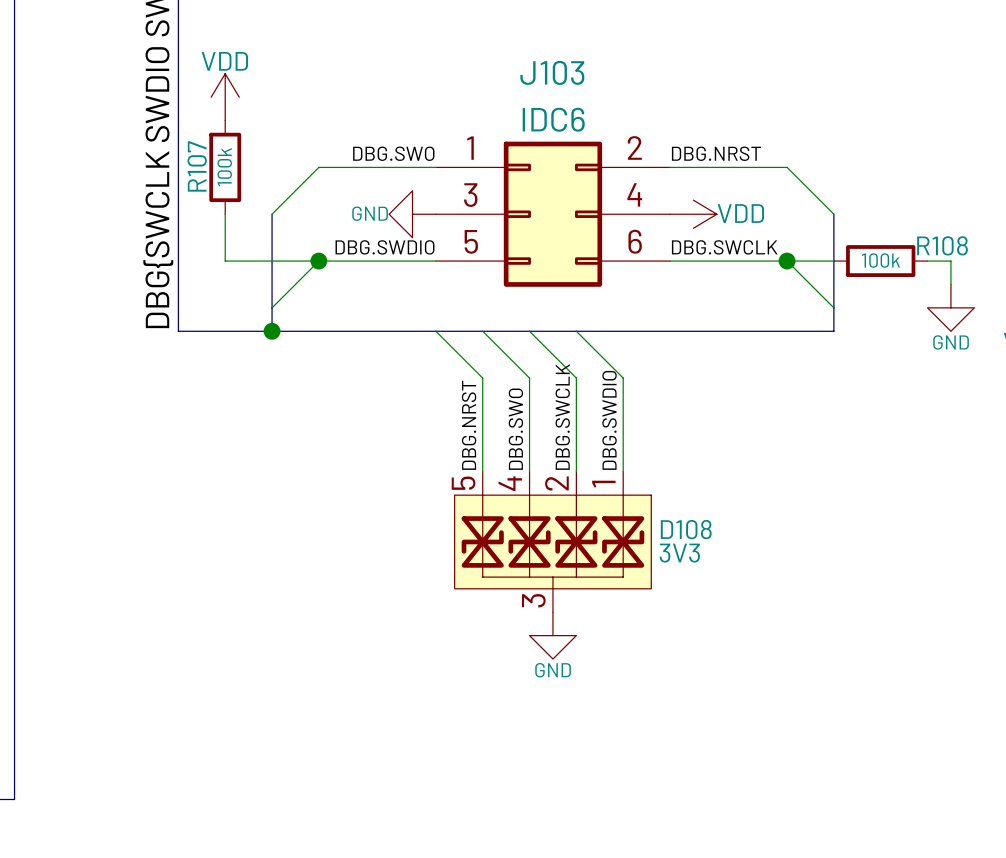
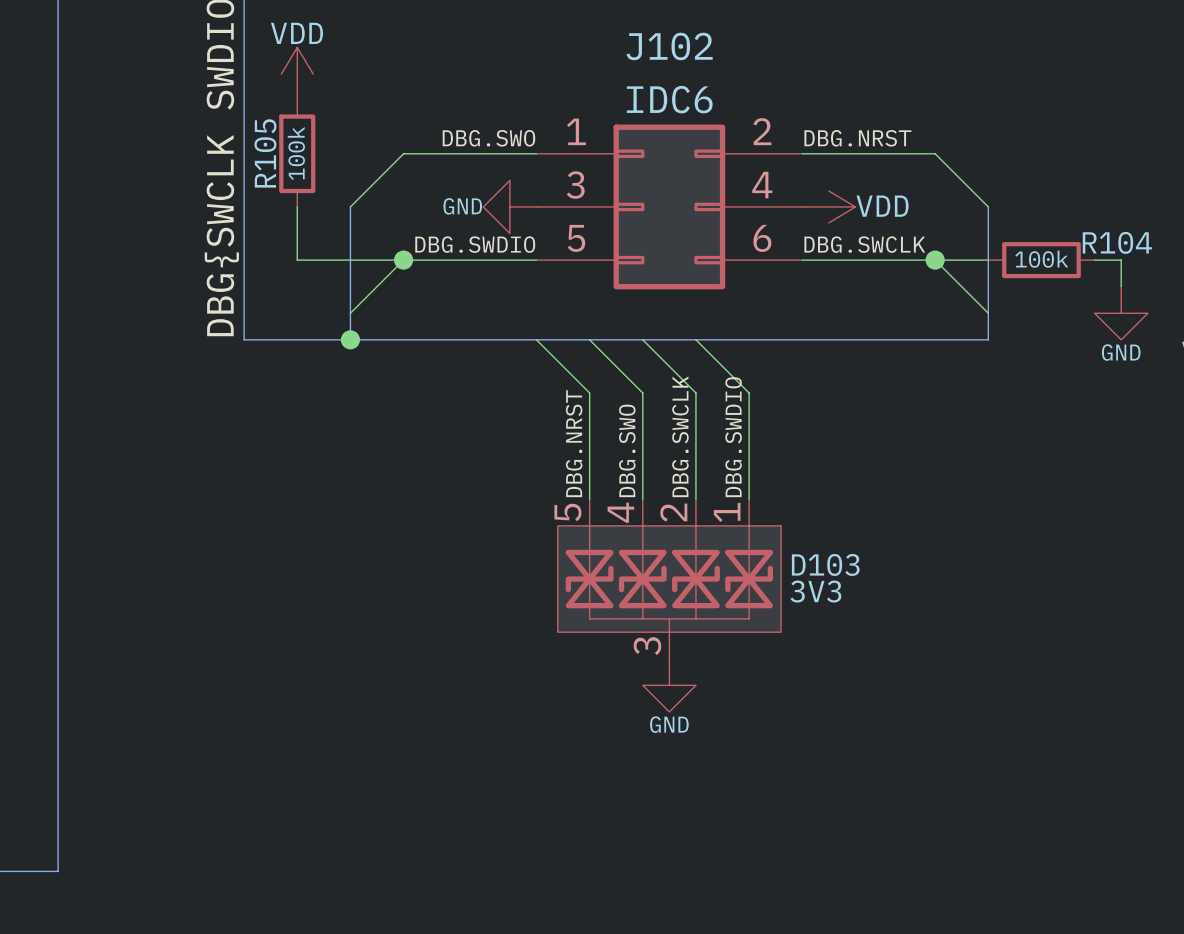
J103 name: J103 (552, 72) -> J102 (669, 46)
R107 name: R107 (197, 166) -> R105 (265, 153)
R108 name: R108 (942, 245) -> R104 (1117, 242)
D108 name: D108 (686, 529) -> D103 (825, 564)

